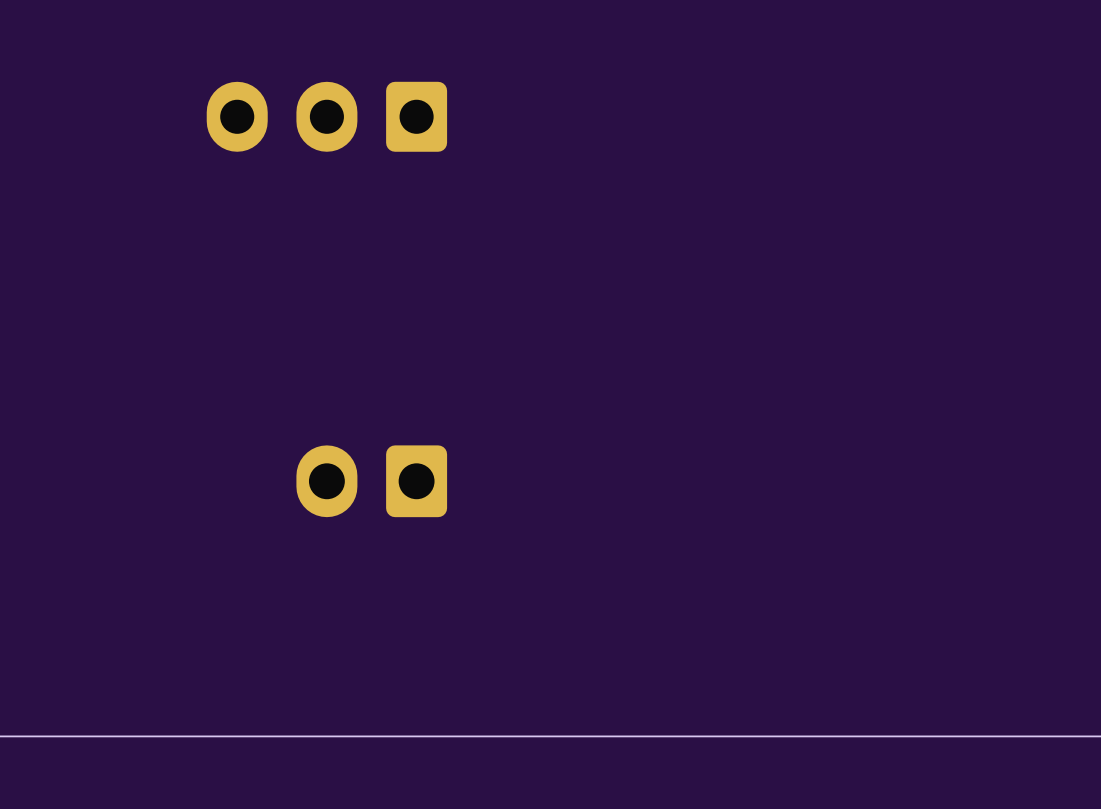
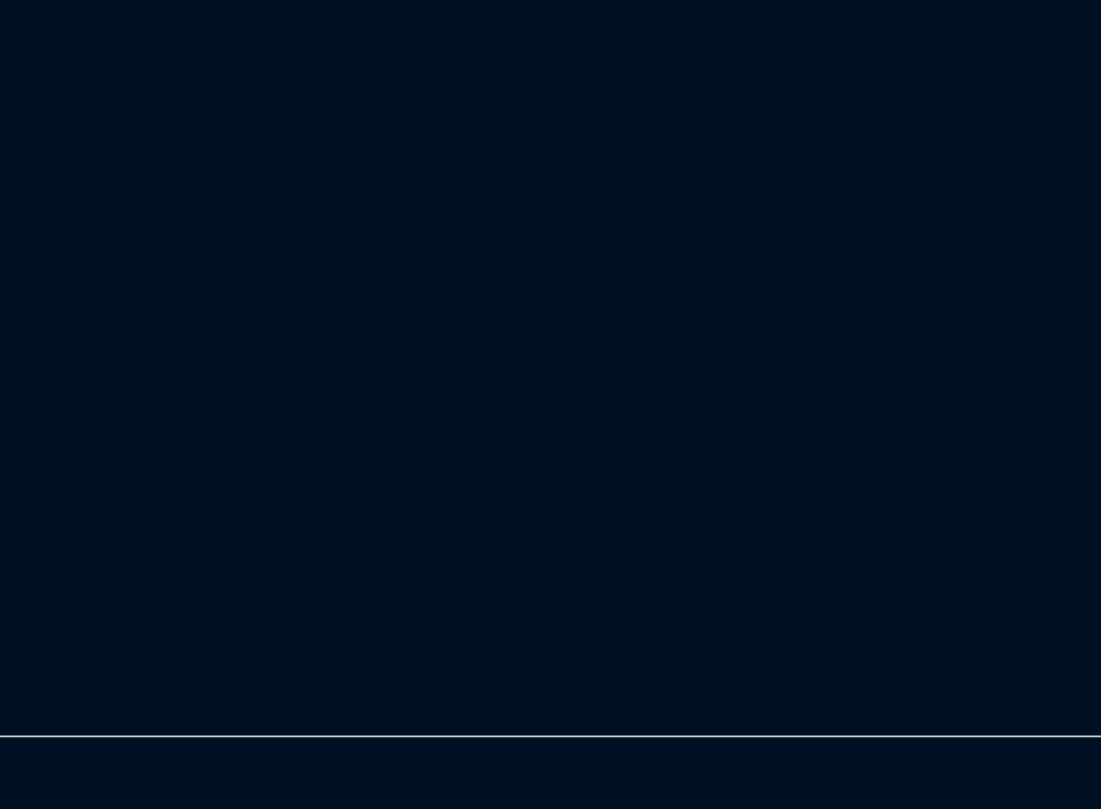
part: (326, 116) -> none
part: (371, 481) -> none

